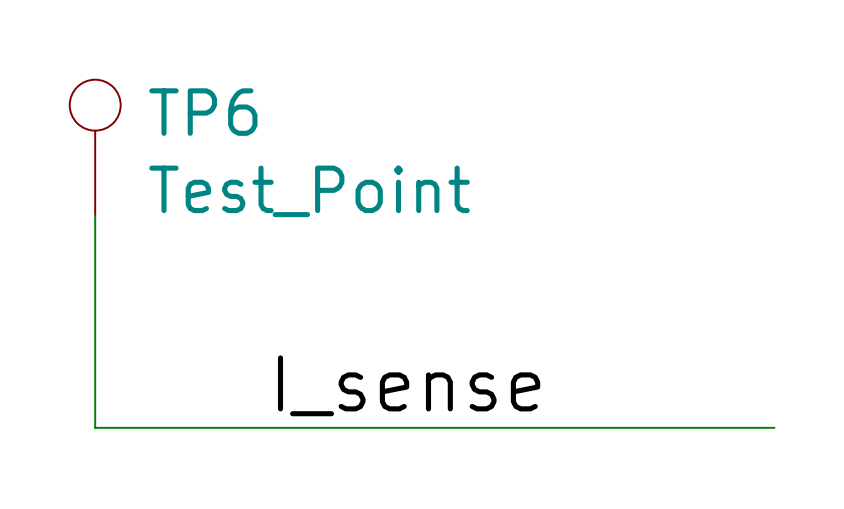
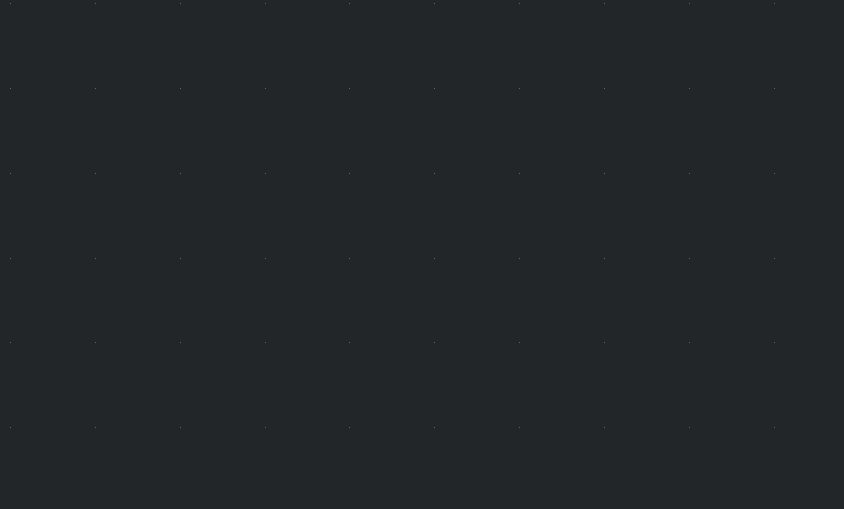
TP6: Test_Point (95, 147) -> none
wire: (95, 215) (95, 427) (774, 427) -> none
label: I_sense (409, 385) -> none

